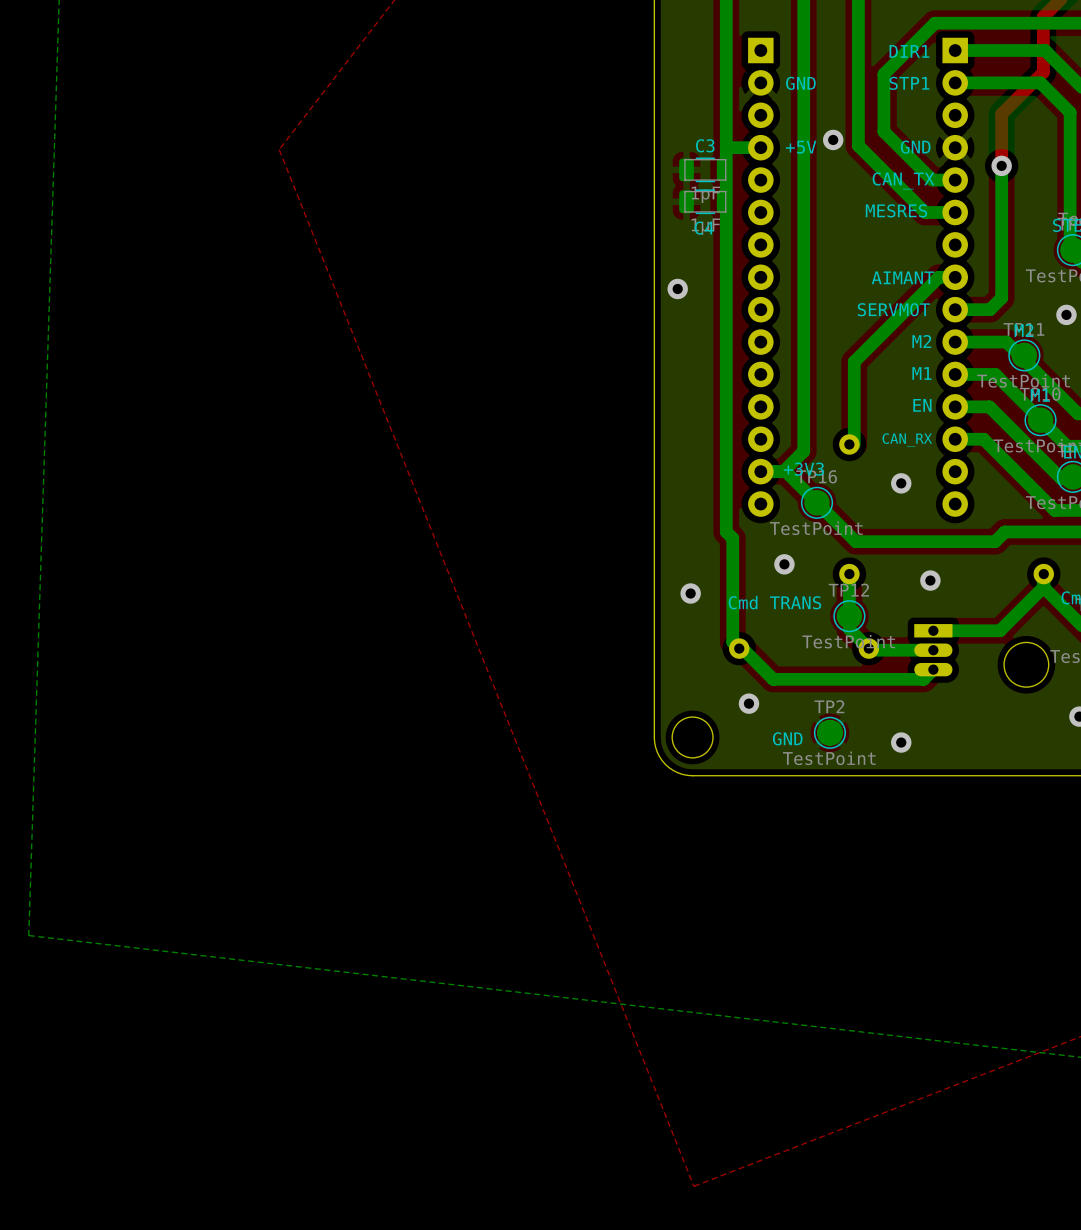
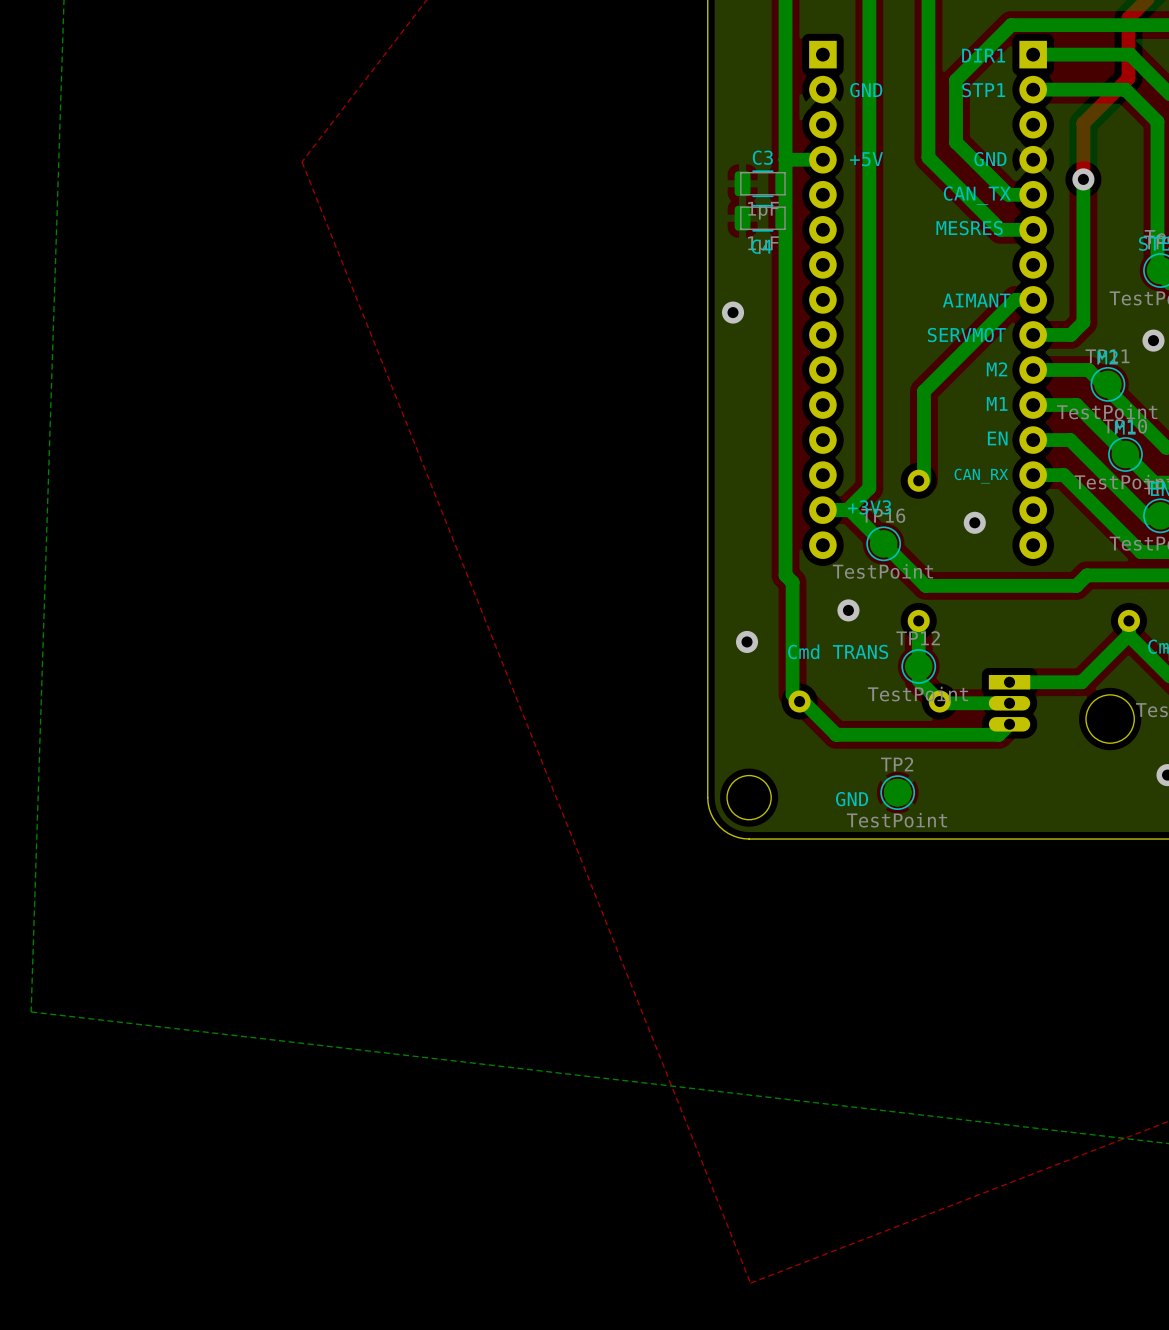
via: (833, 139) -> none
via: (930, 580) -> none
via: (748, 703) -> none
via: (901, 742) -> none

